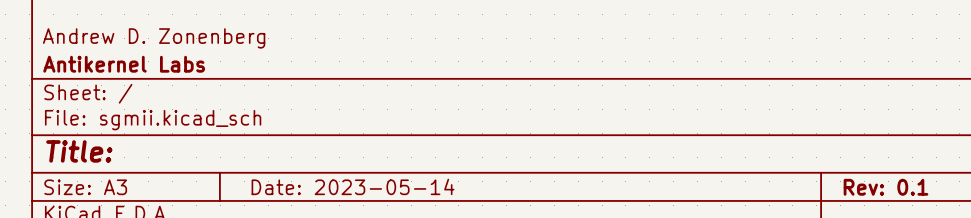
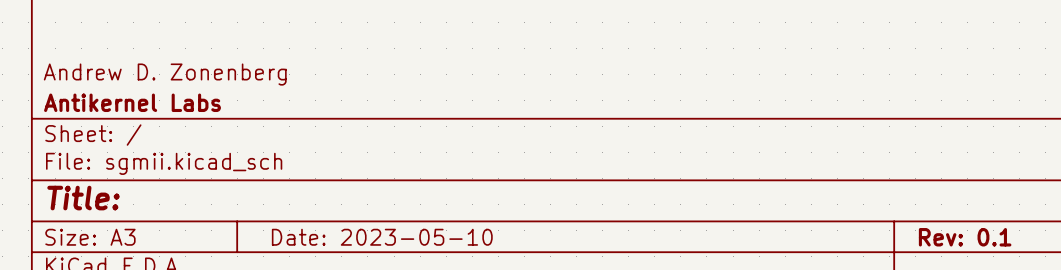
title block: Date: 2023-05-14 (353, 186) -> Date: 2023-05-10 (382, 237)

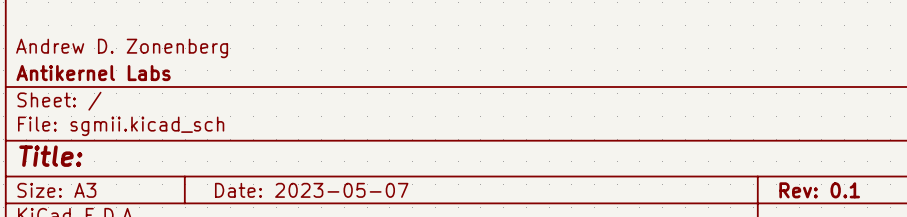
title block: Date: 2023-05-10 (382, 237) -> Date: 2023-05-07 (311, 190)

